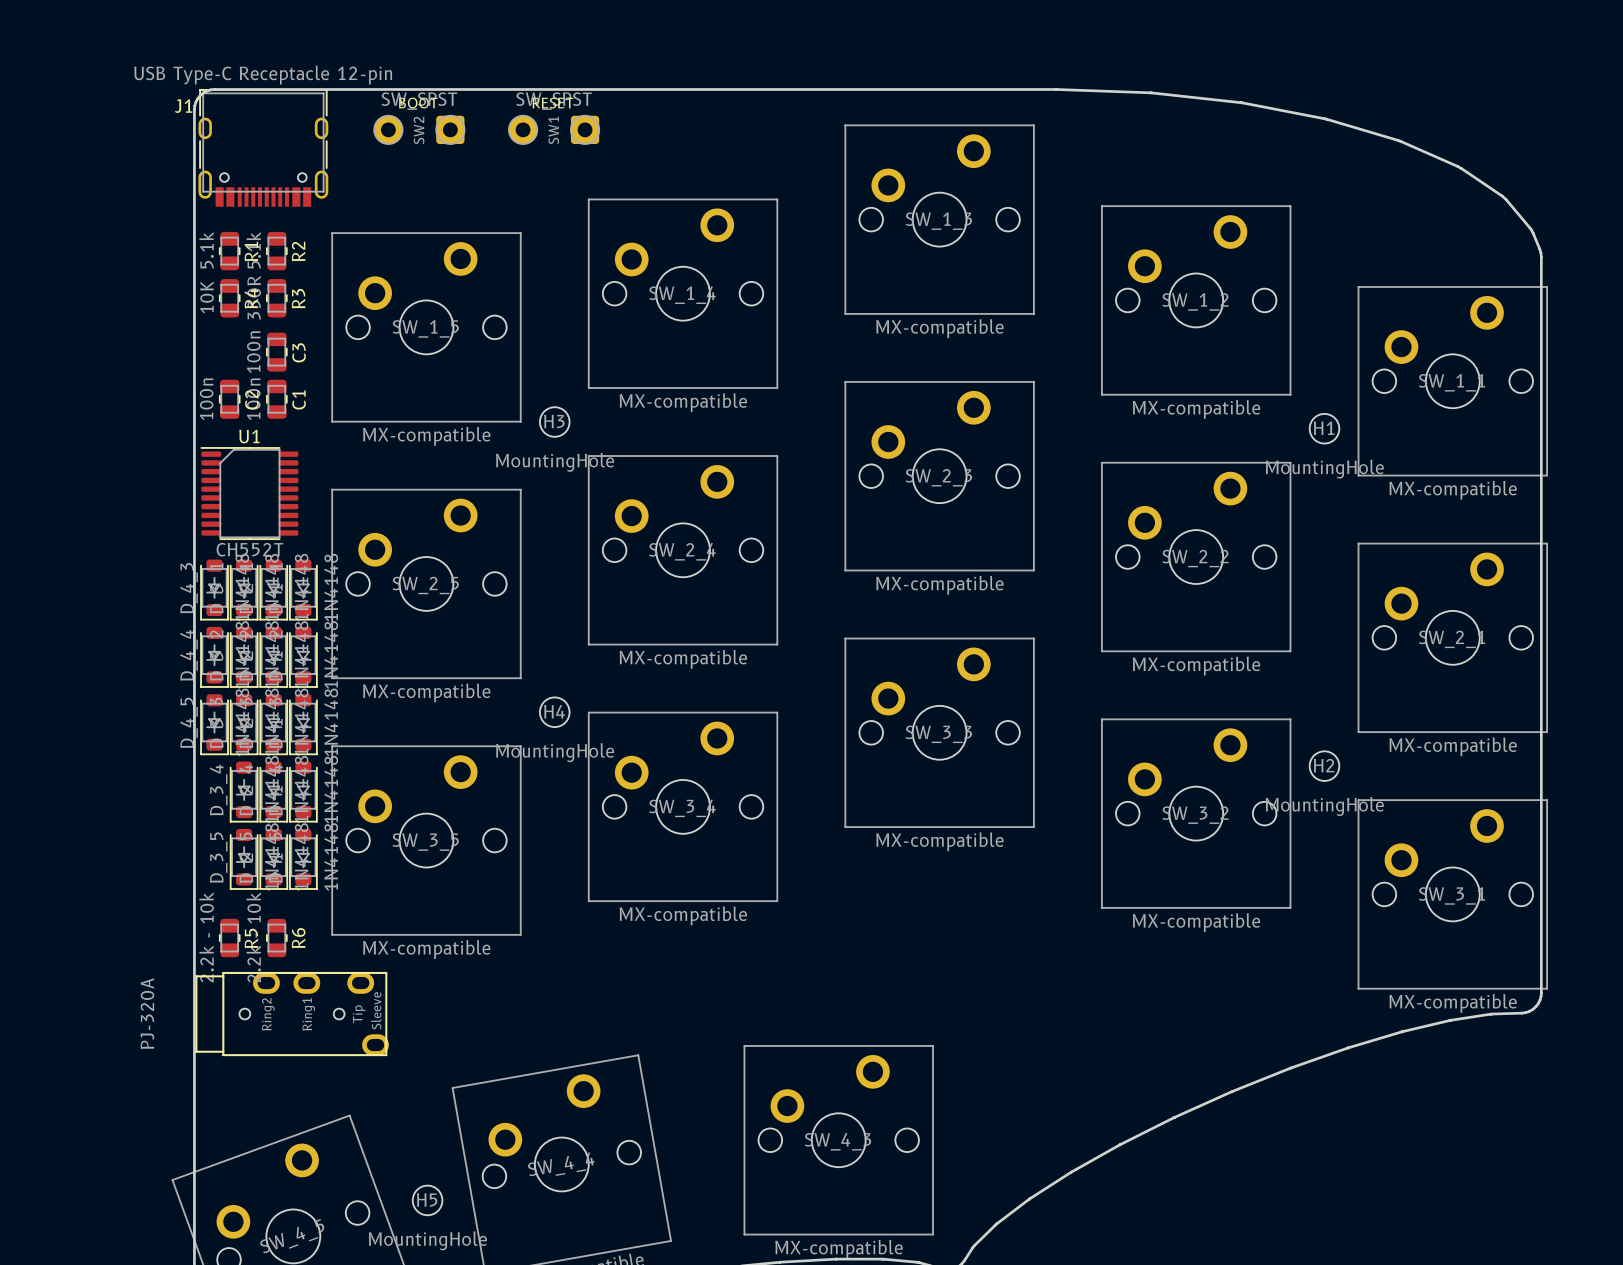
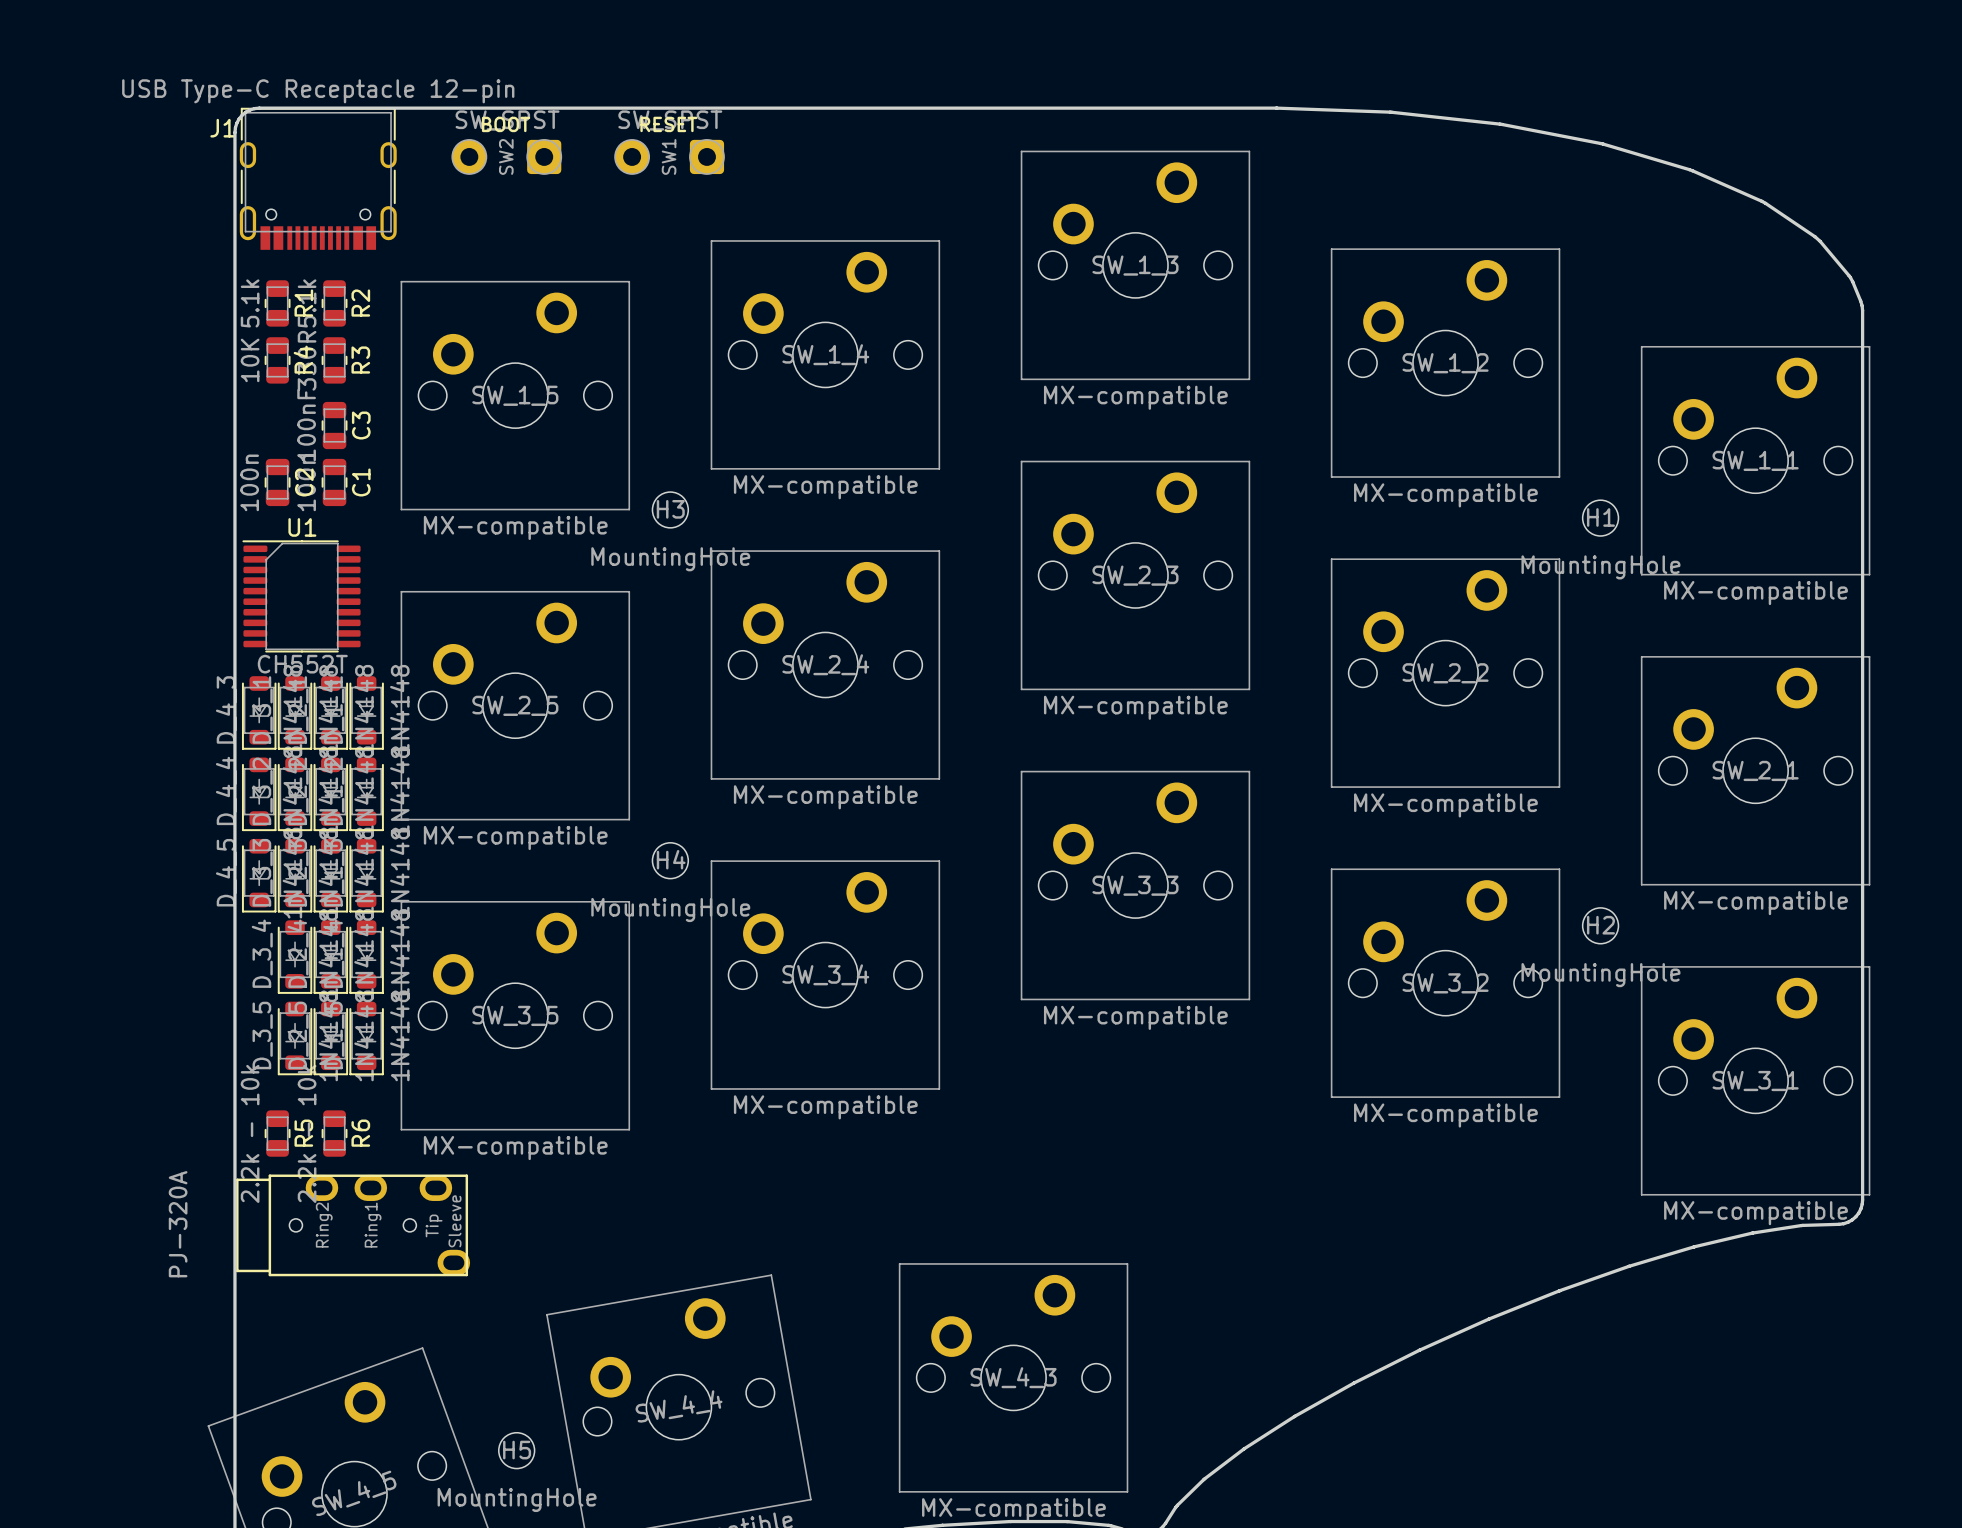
C3 value: 100n (253, 352) -> 100nF (306, 425)

